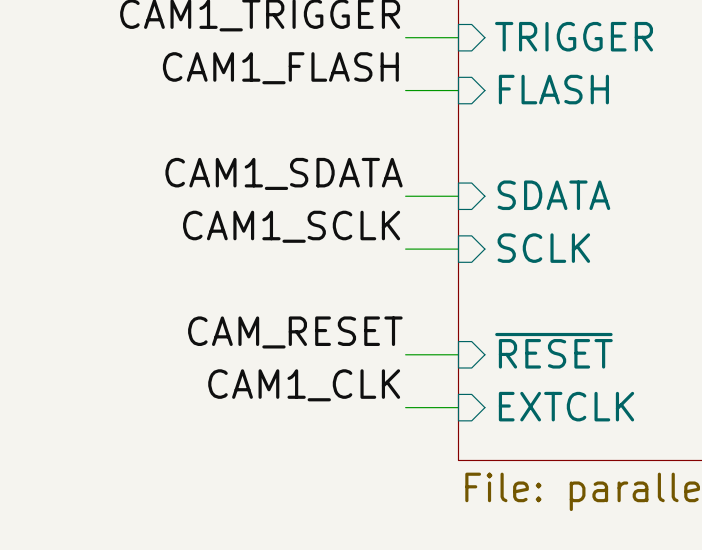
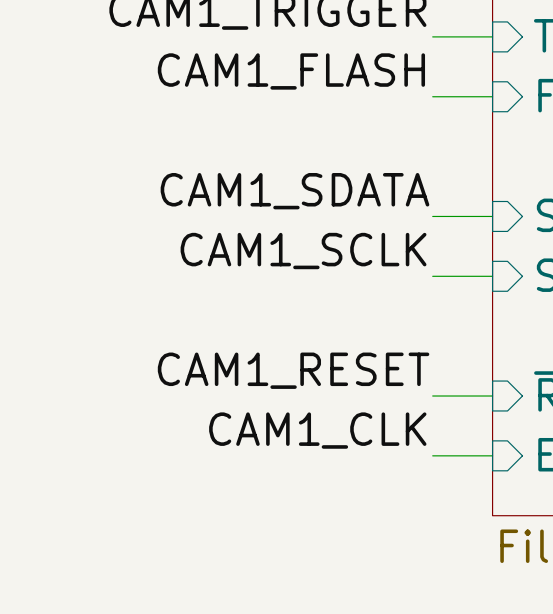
label: CAM_RESET (295, 332) -> CAM1_RESET (293, 370)

